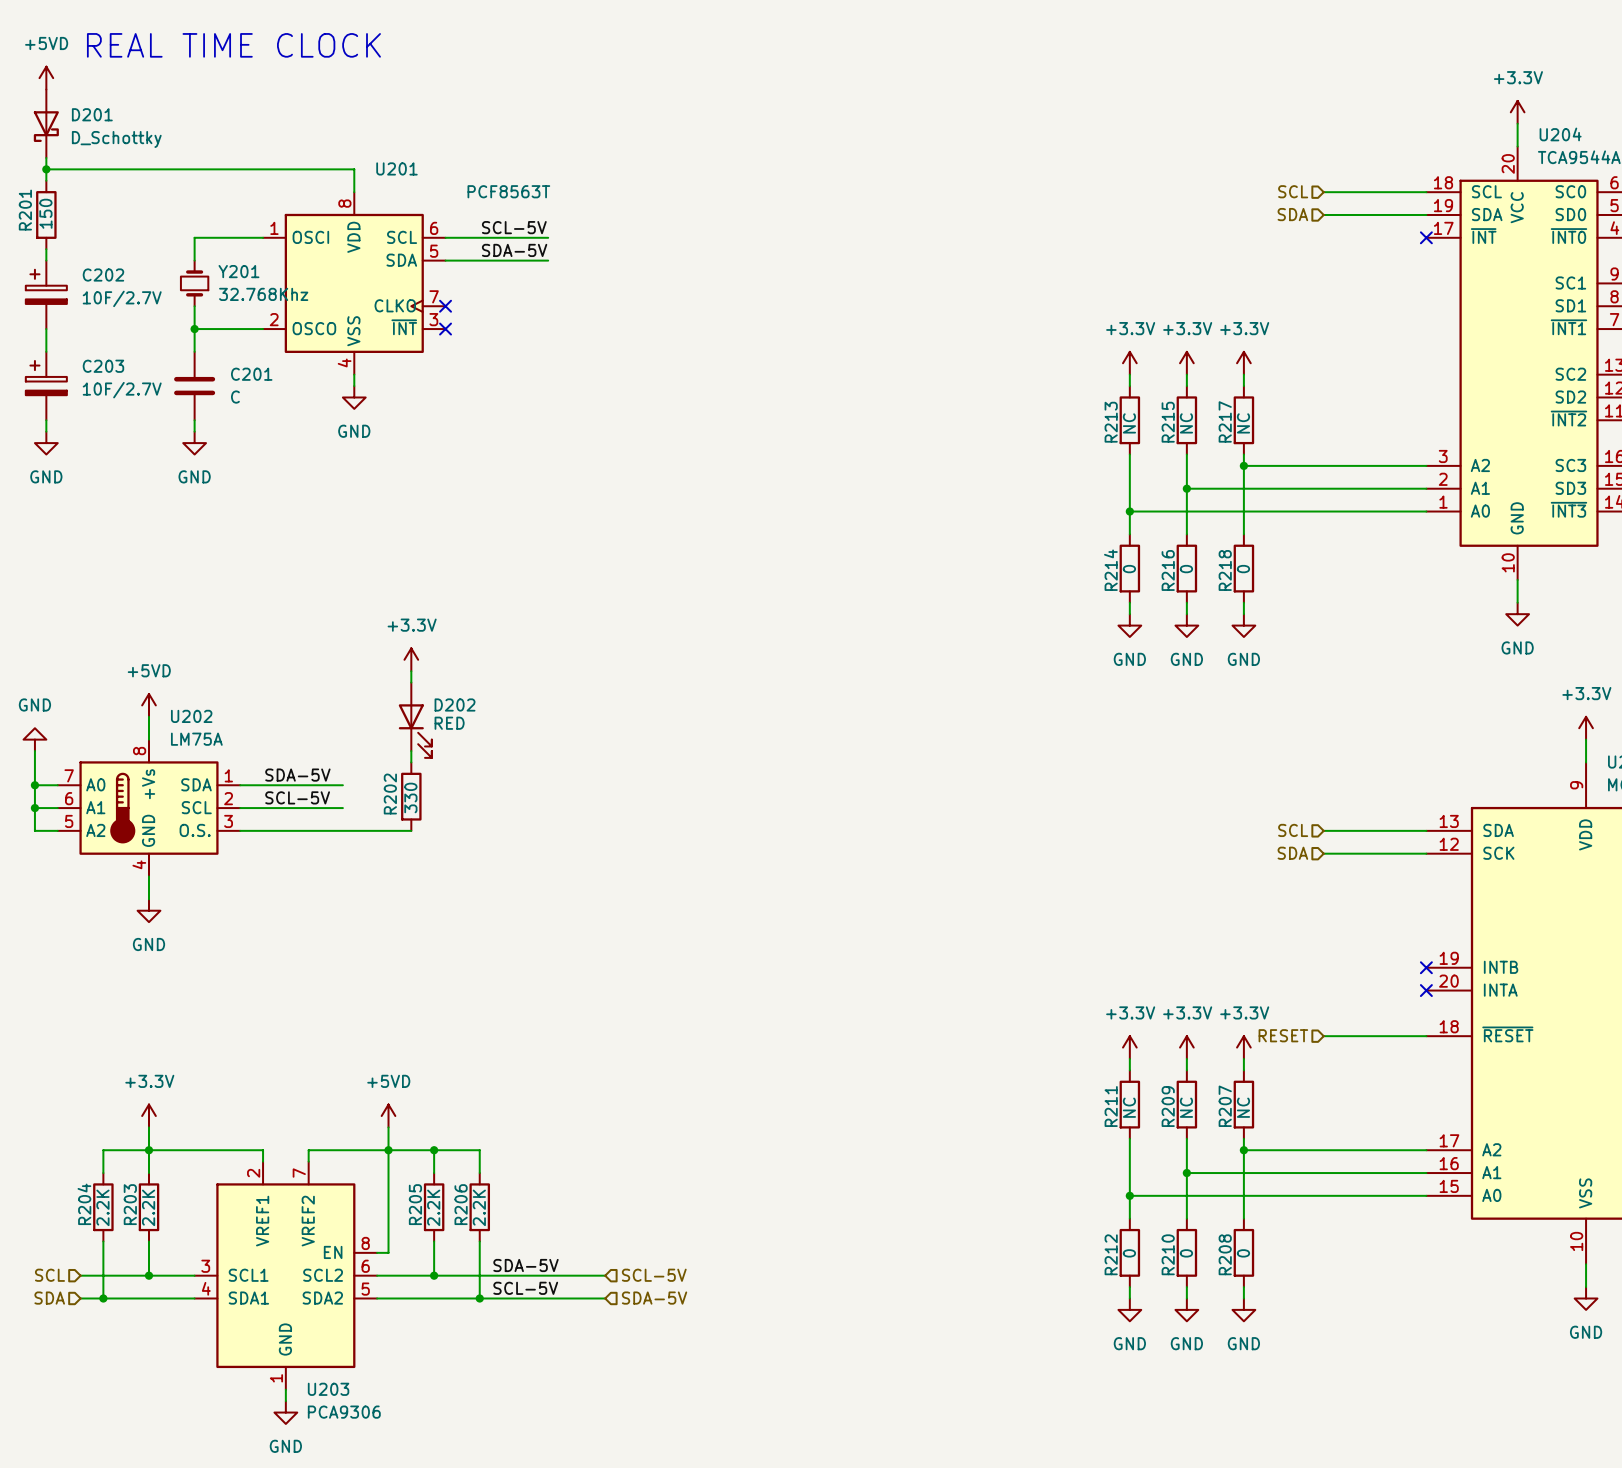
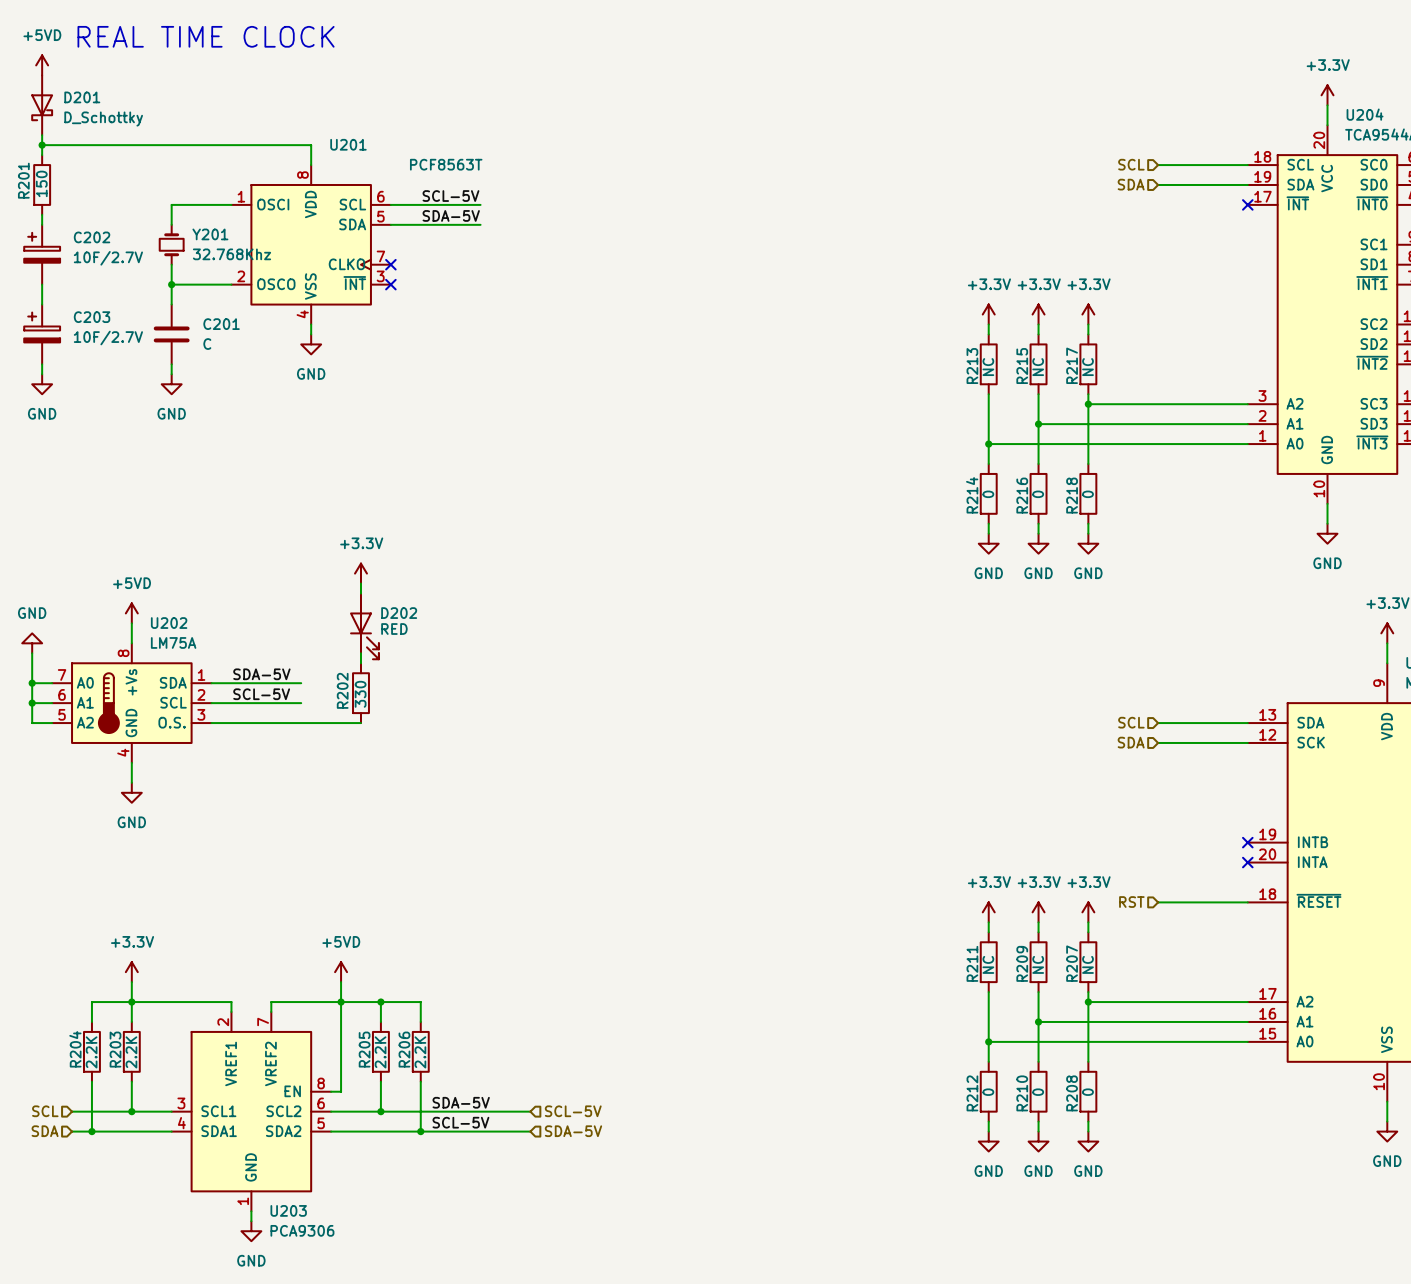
hierarchical label: RESET (1283, 1035) -> RST (1131, 902)

